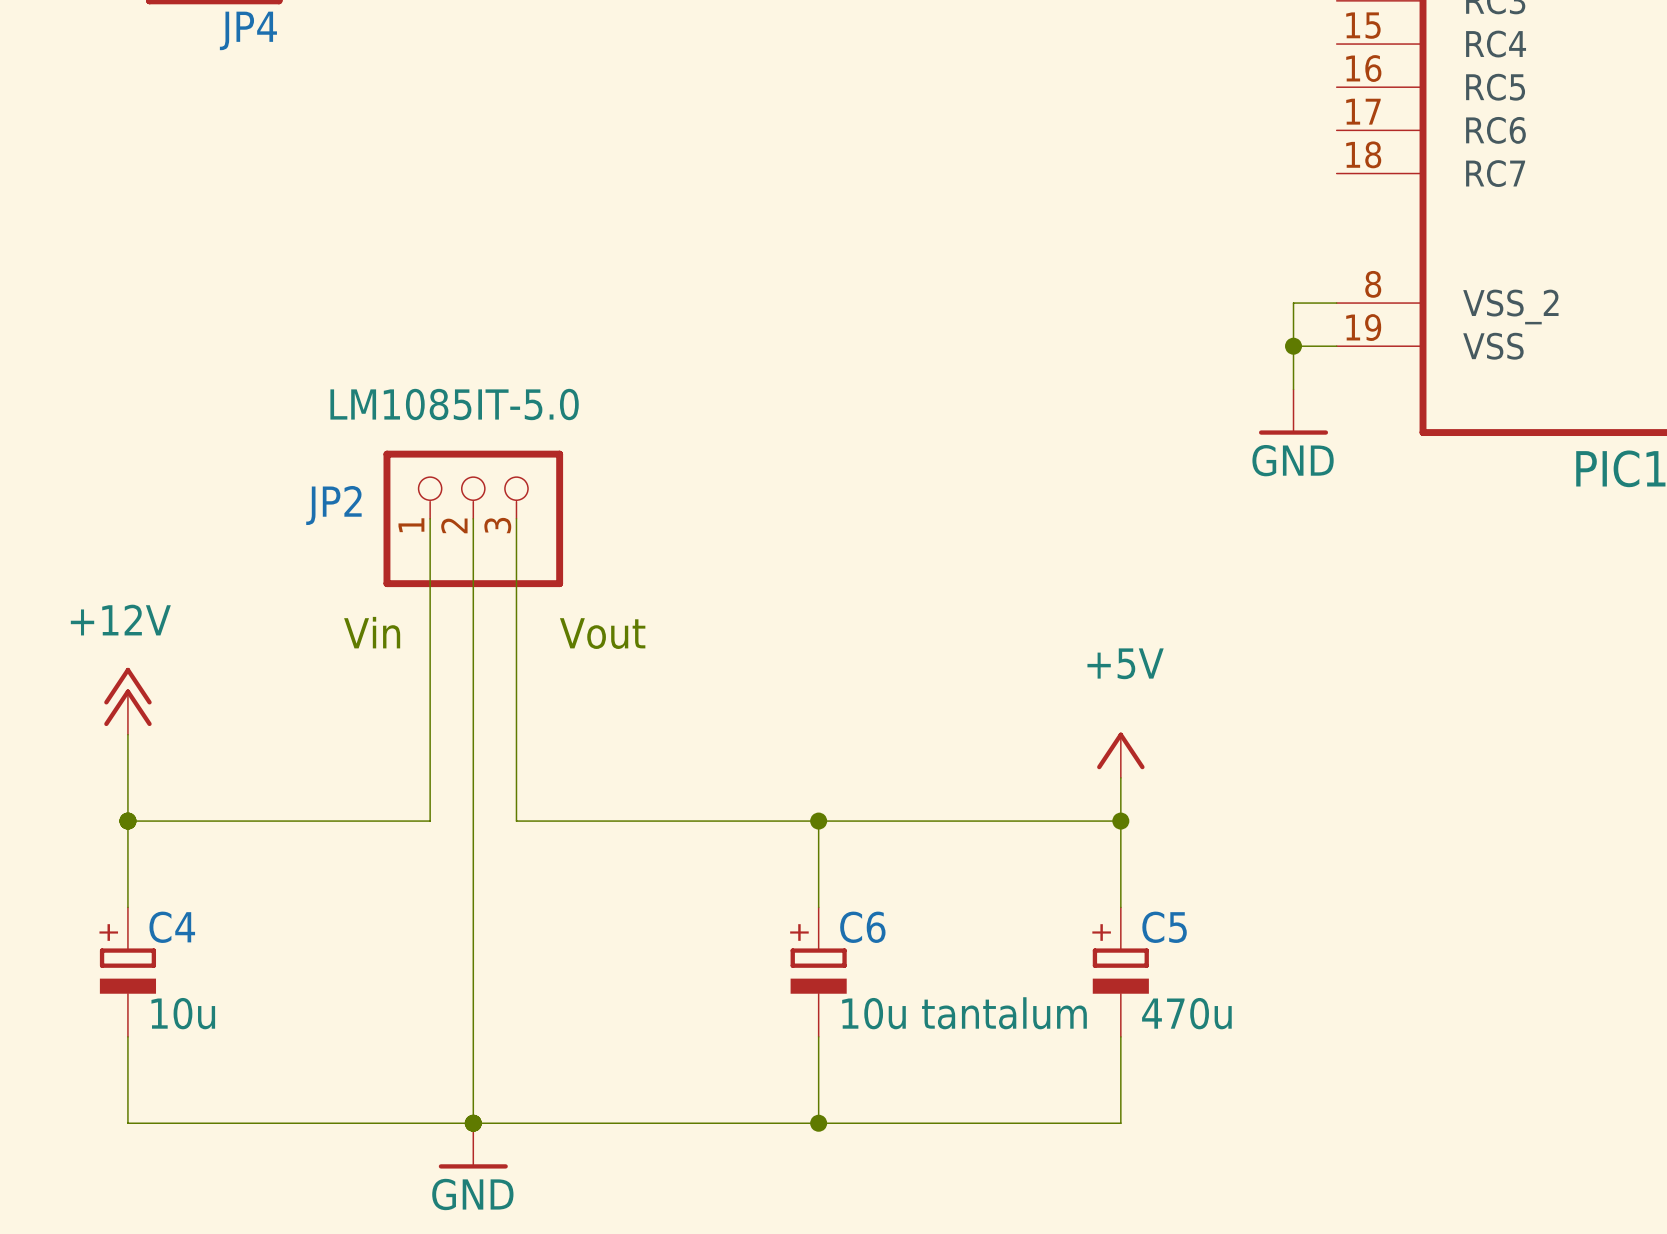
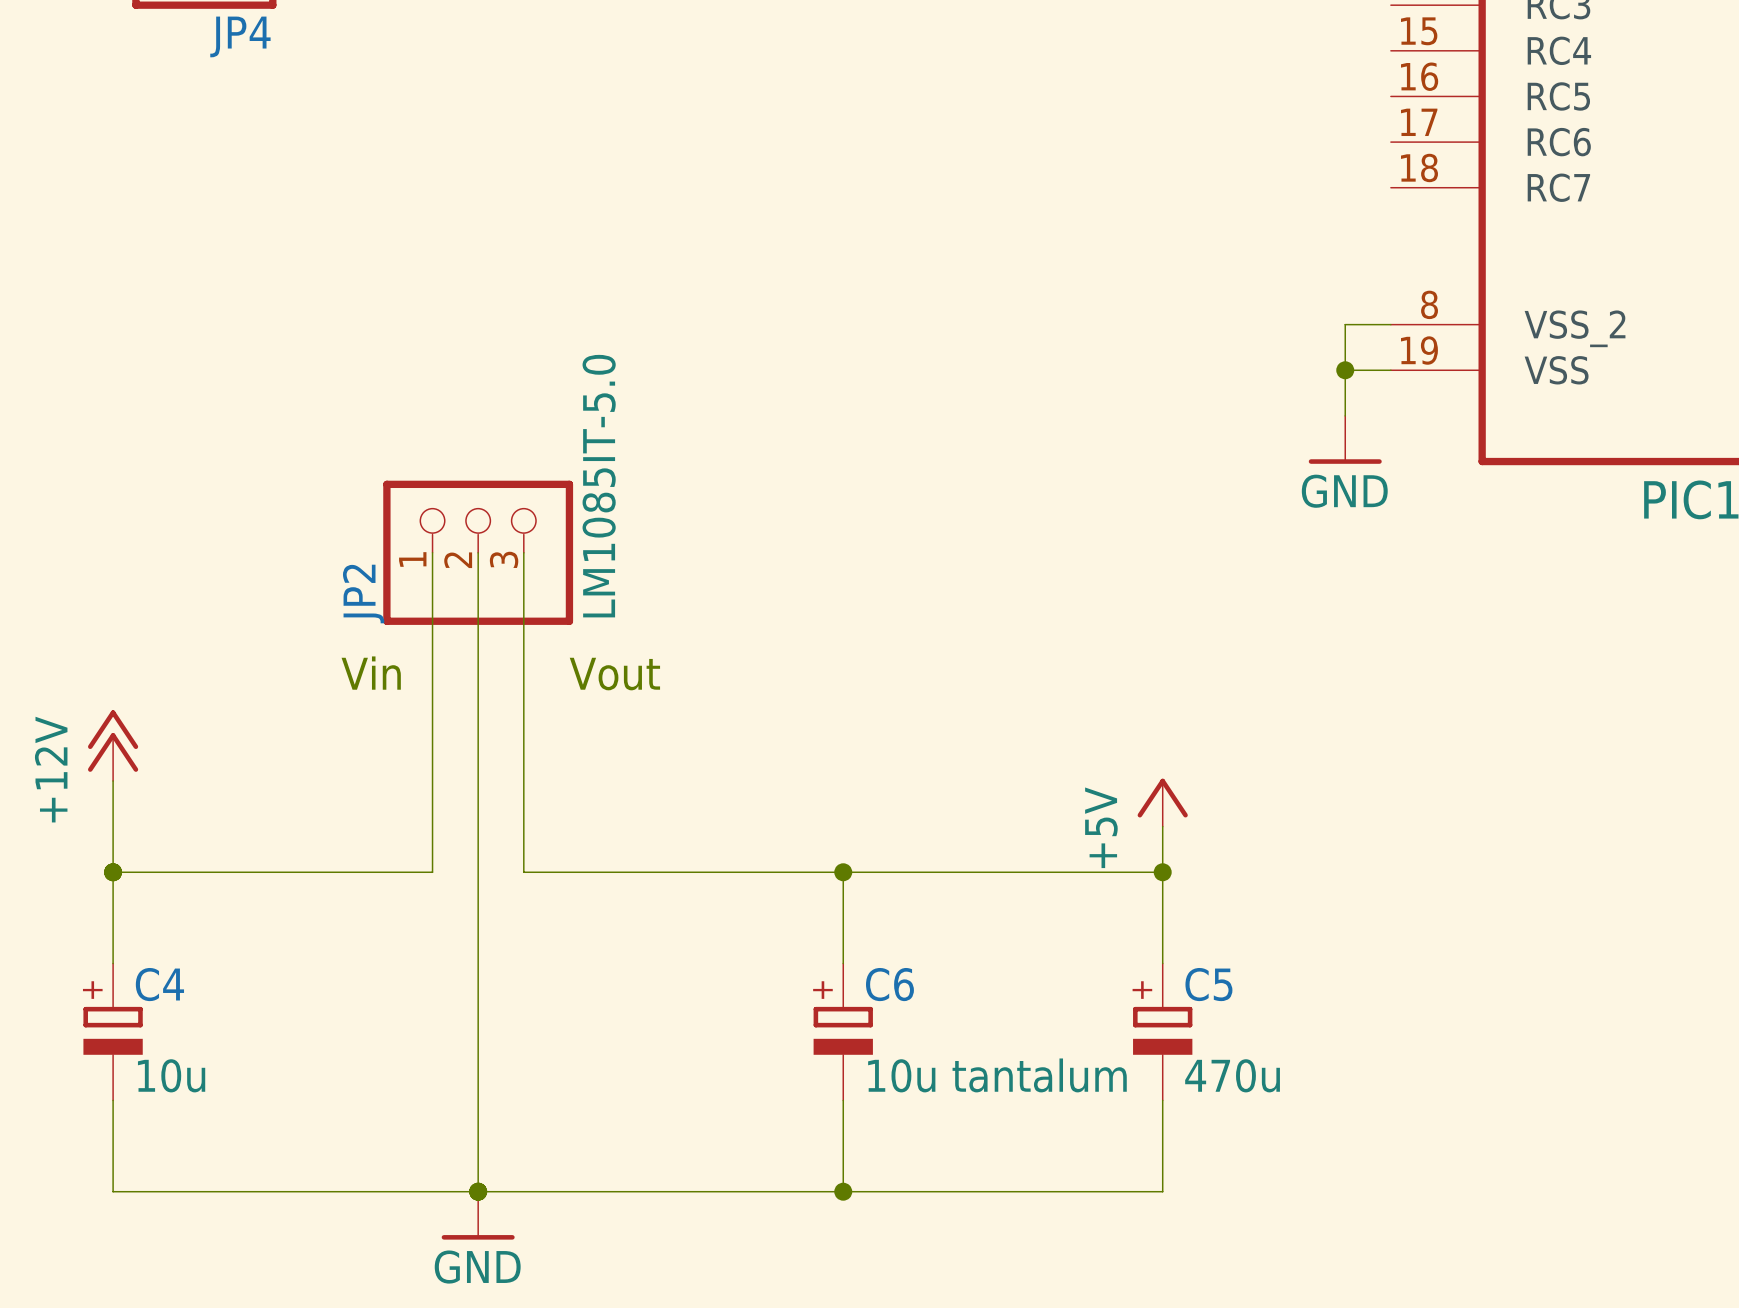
JP2 value rotation: 0° (454, 404) -> 90° counterclockwise (599, 486)
JP2 name rotation: 0° (333, 505) -> 90° counterclockwise (363, 594)
power symbol text rotation: 0° (120, 620) -> 90° counterclockwise (51, 769)
power symbol text rotation: 0° (1125, 663) -> 90° counterclockwise (1101, 827)
power symbol text position: +5V (1125, 663) -> +5V (1101, 827)

